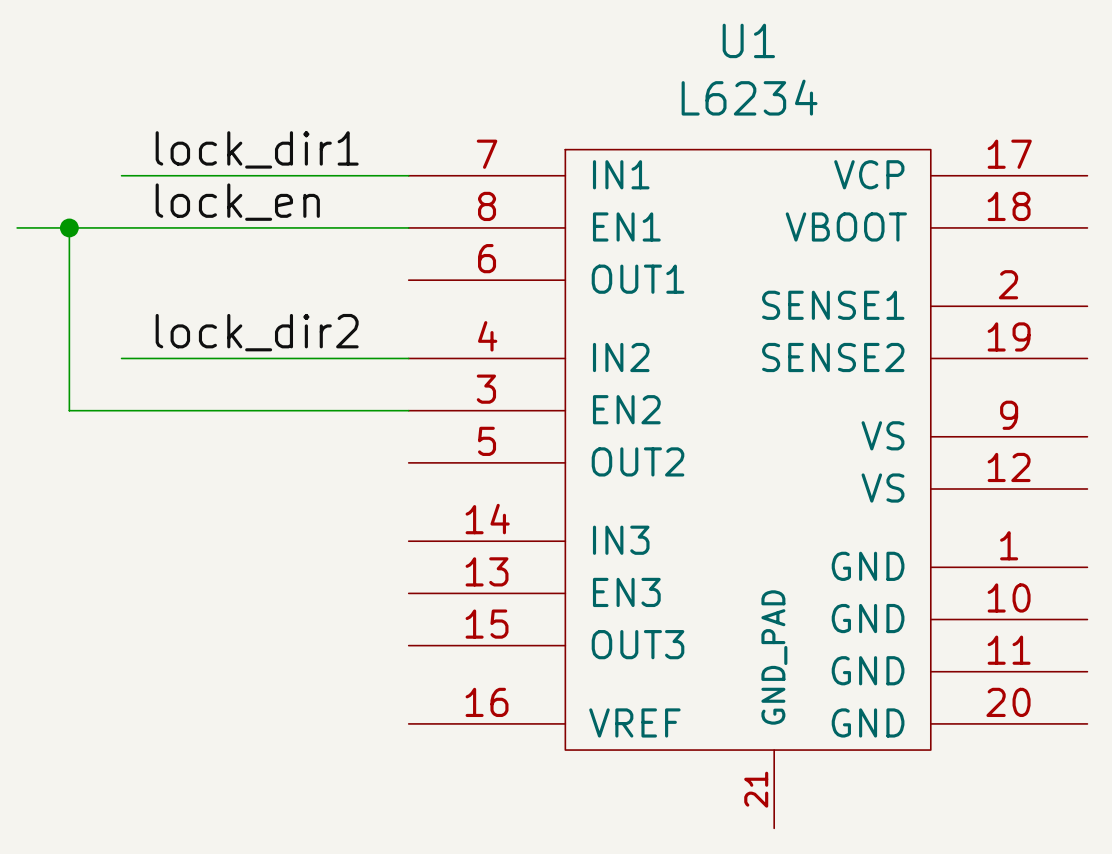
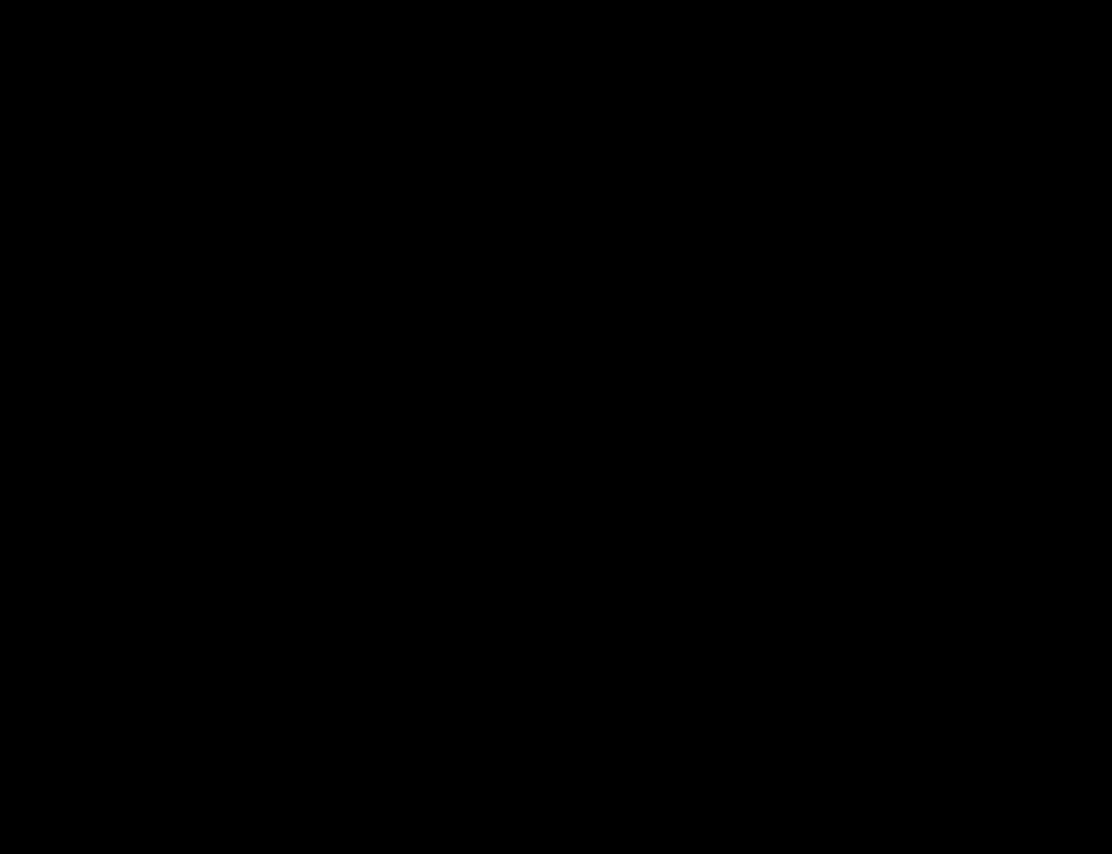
label: lock_dir1 (257, 149) -> none
wire: (121, 175) (408, 175) -> none
label: lock_en (237, 202) -> none
wire: (17, 227) (408, 227) -> none
wire: (69, 227) (69, 410) (408, 410) -> none
junction: (69, 227) -> none
label: lock_dir2 (257, 332) -> none
wire: (121, 358) (408, 358) -> none
U1: L6234 (748, 489) -> none

